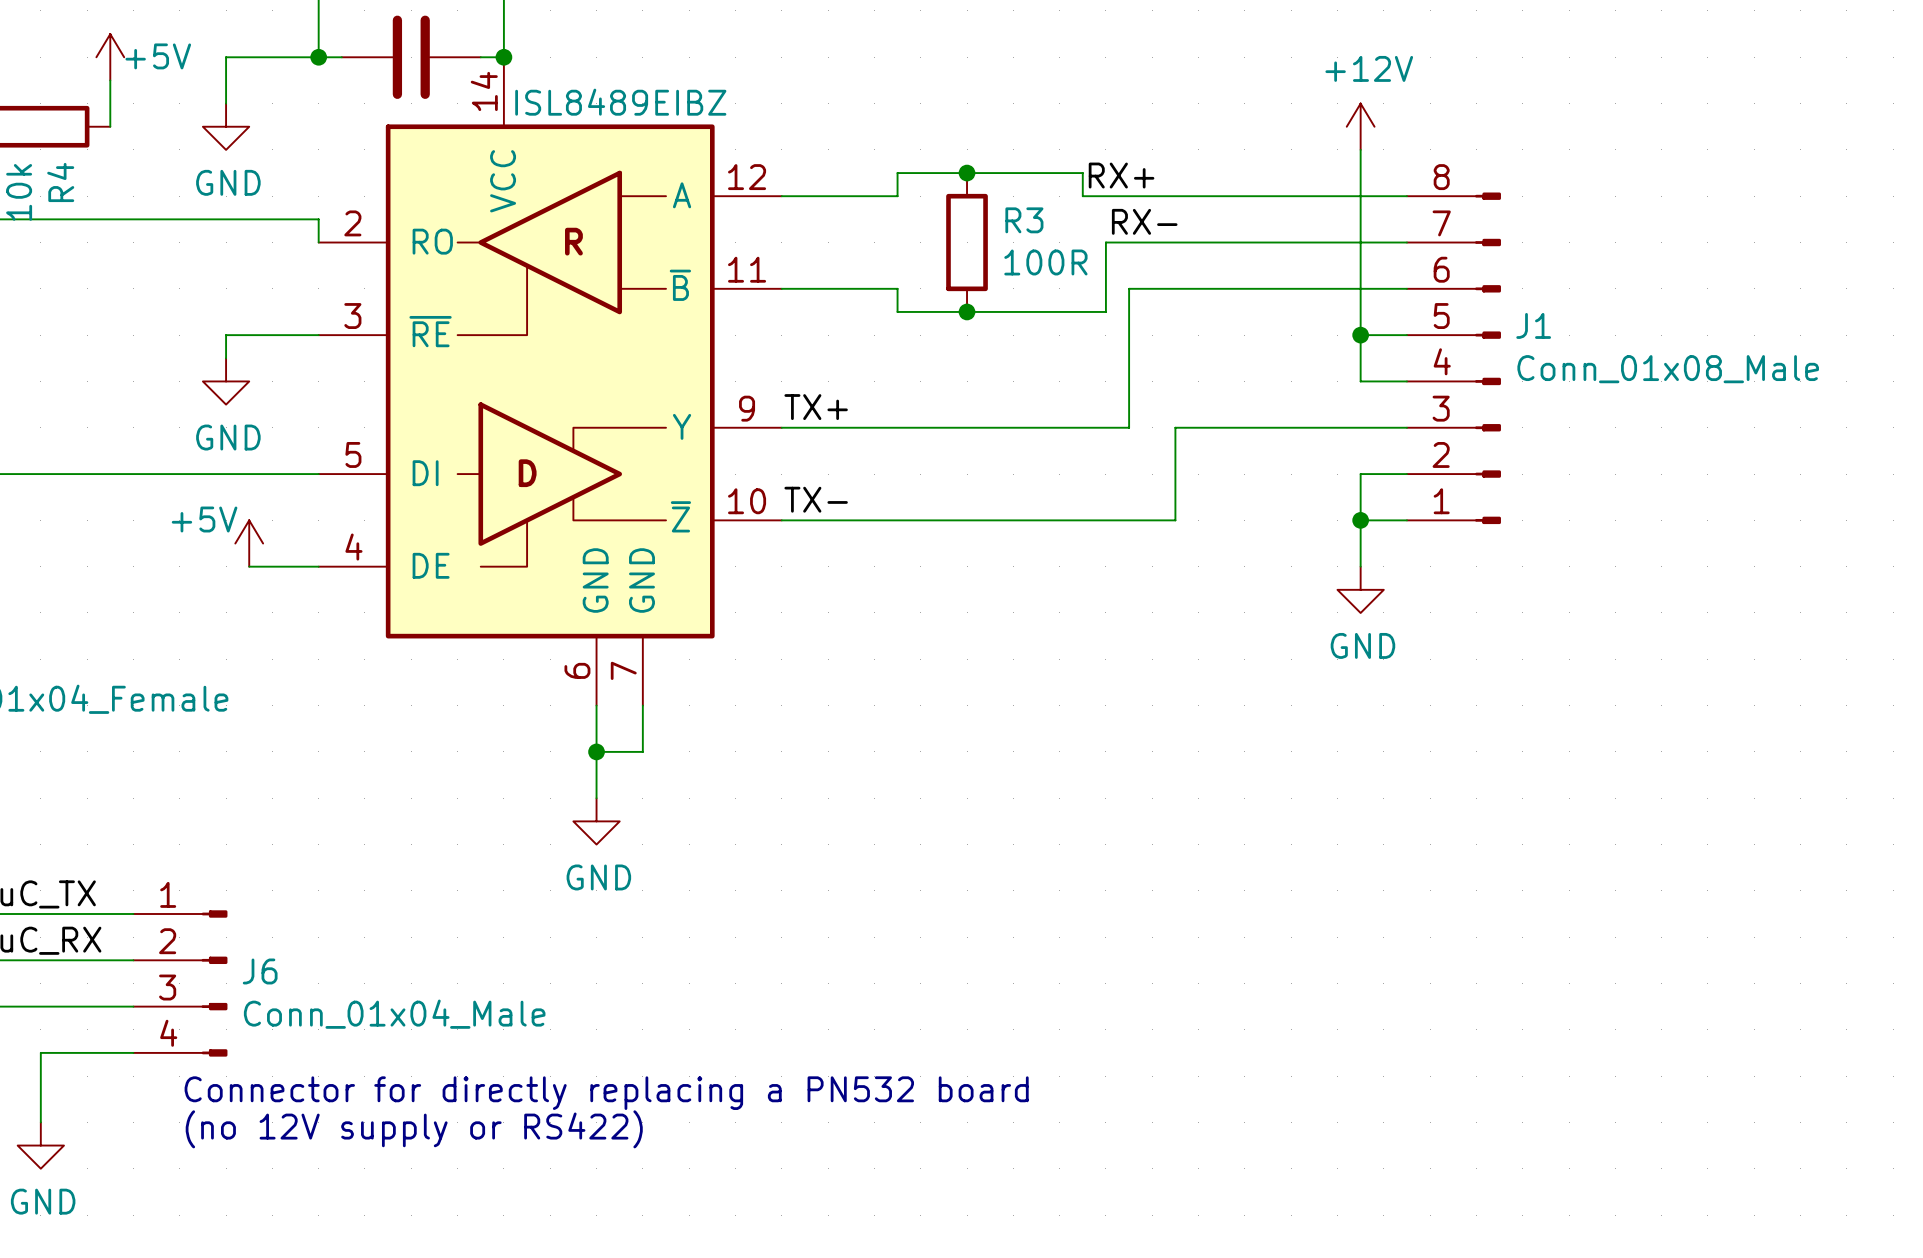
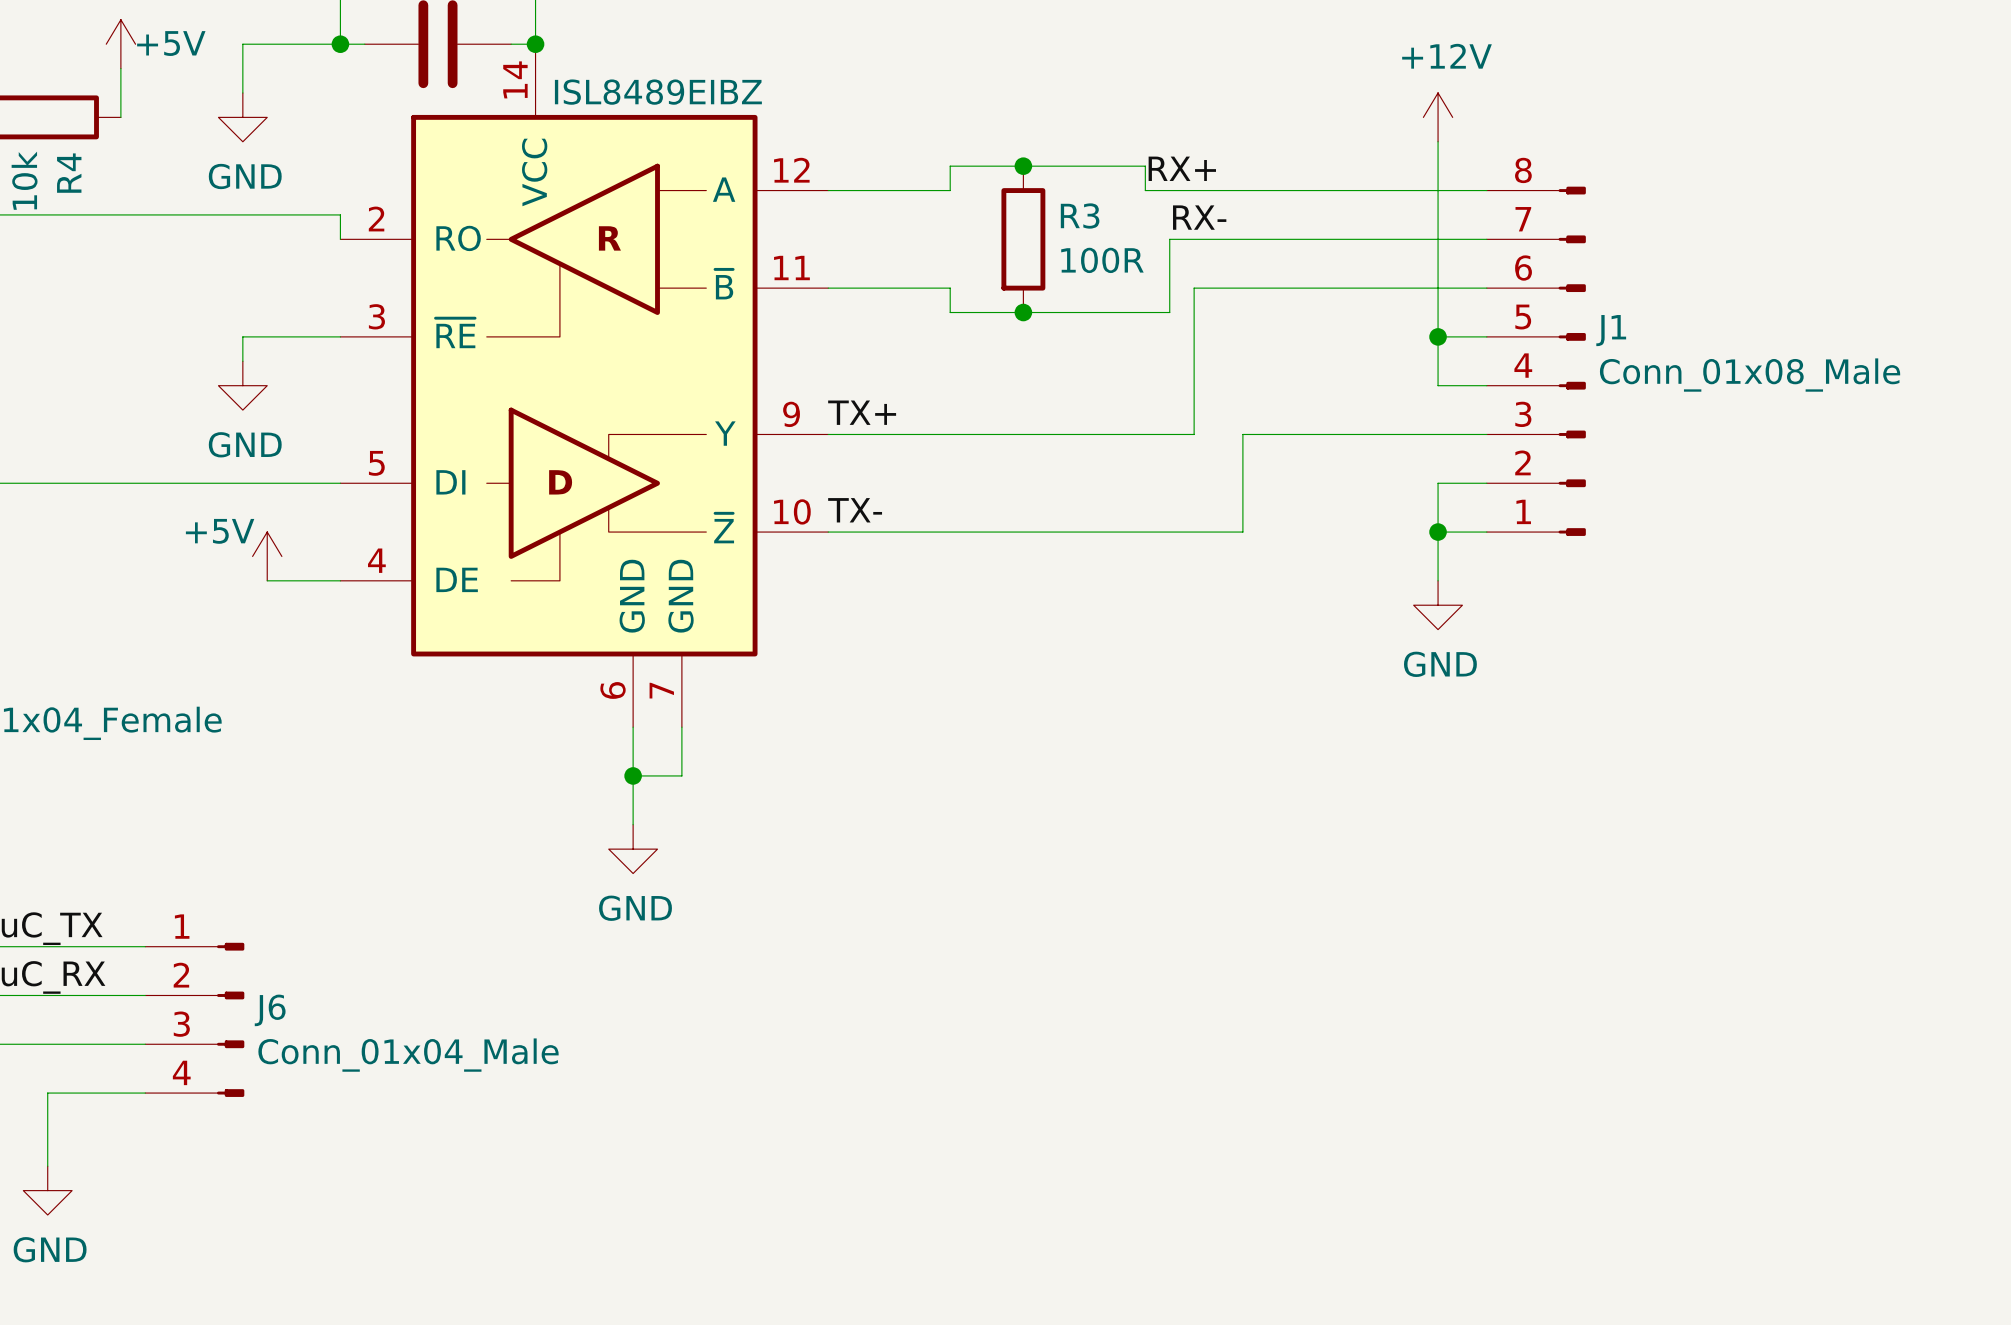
text: Connector for directly replacing a PN532 board (606, 1093) -> none
text: (no 12V supply or RS422) (414, 1129) -> none

